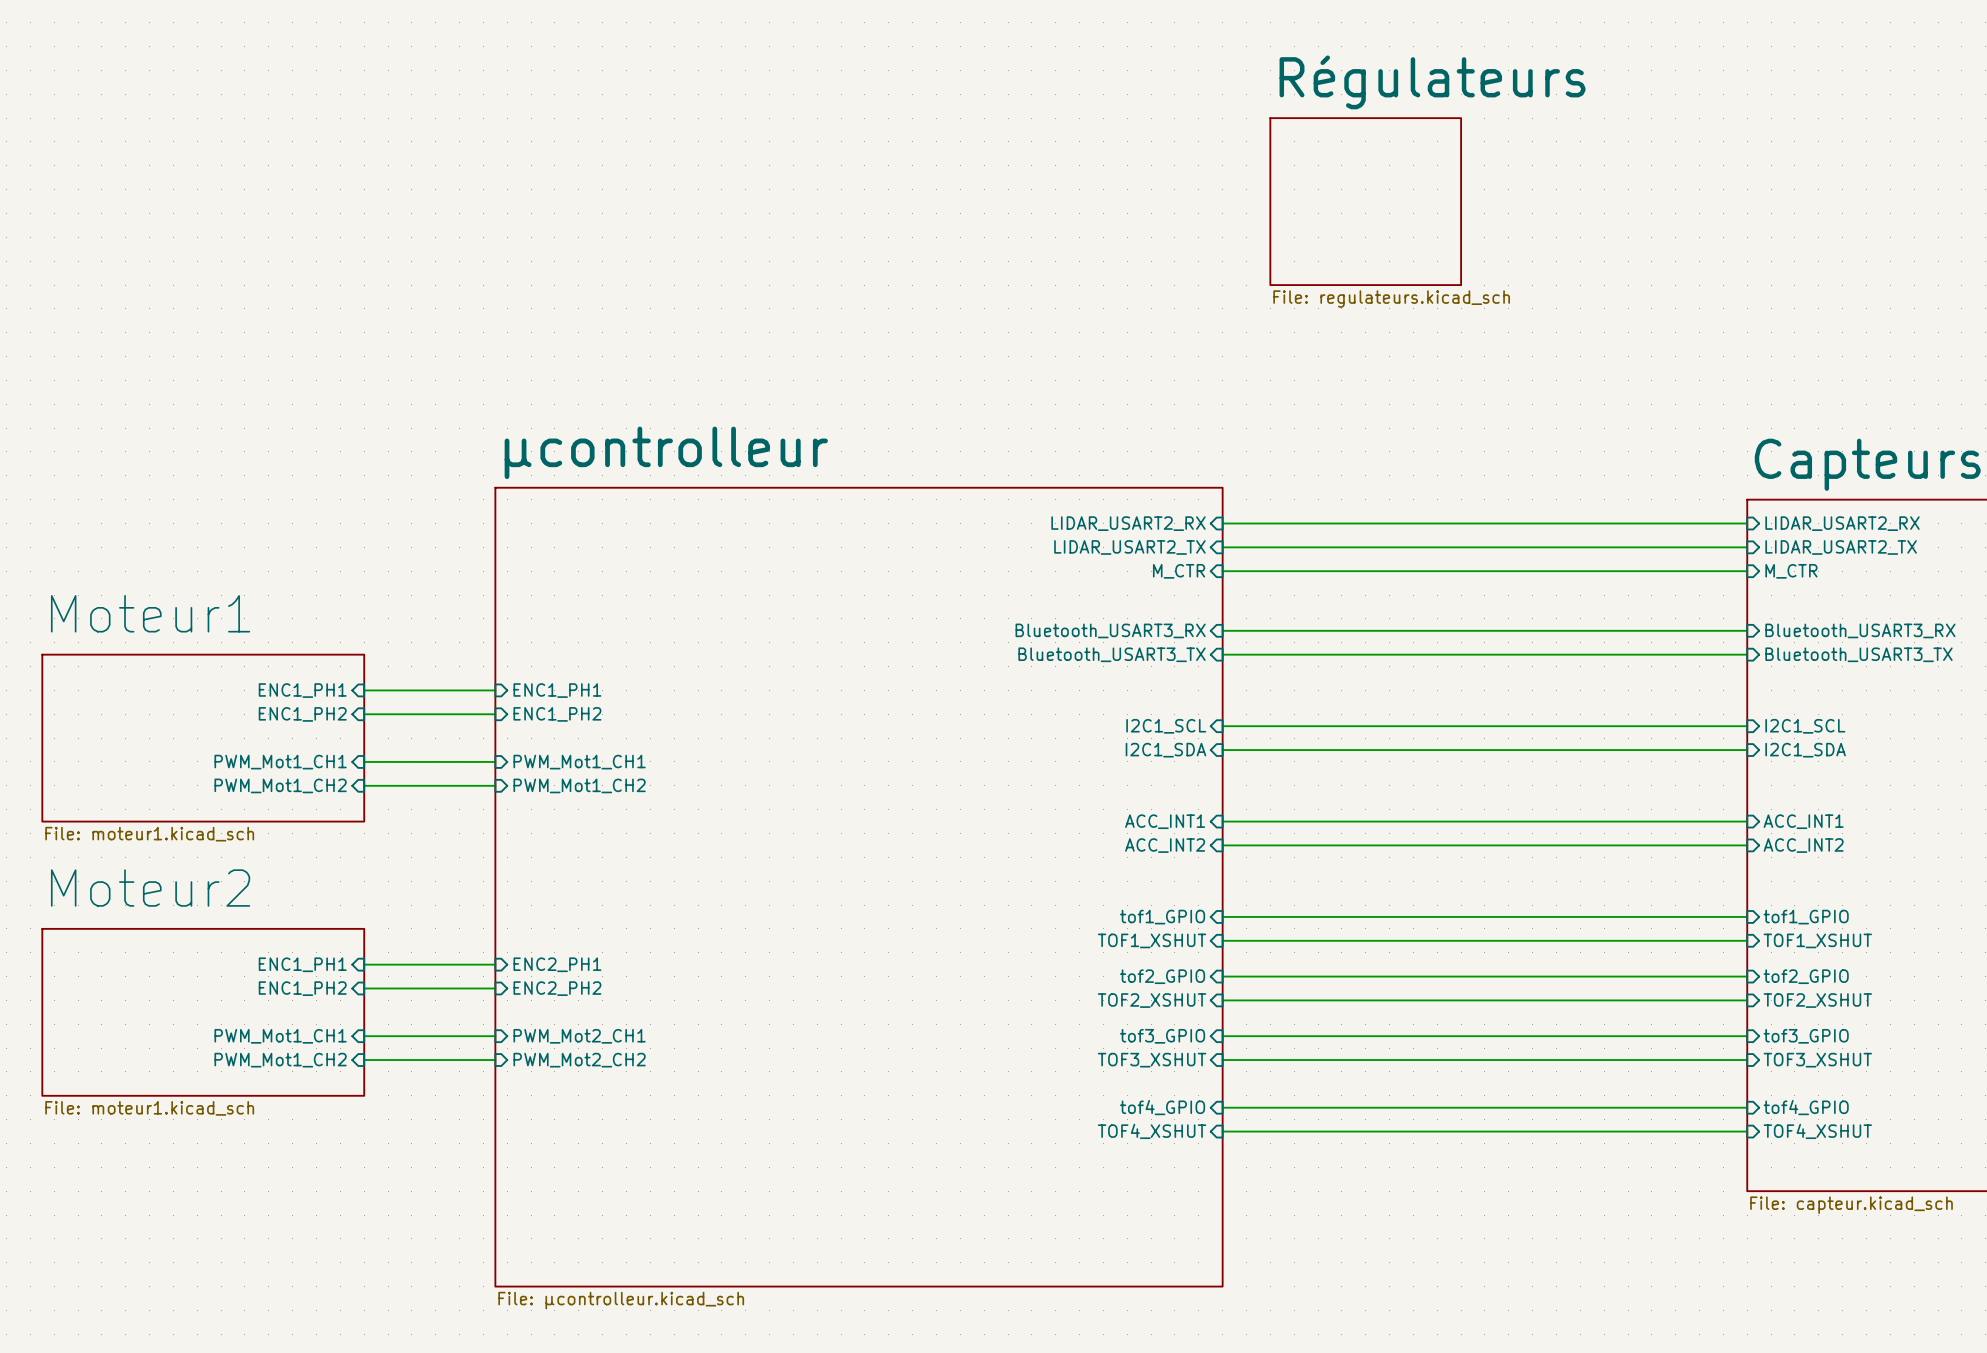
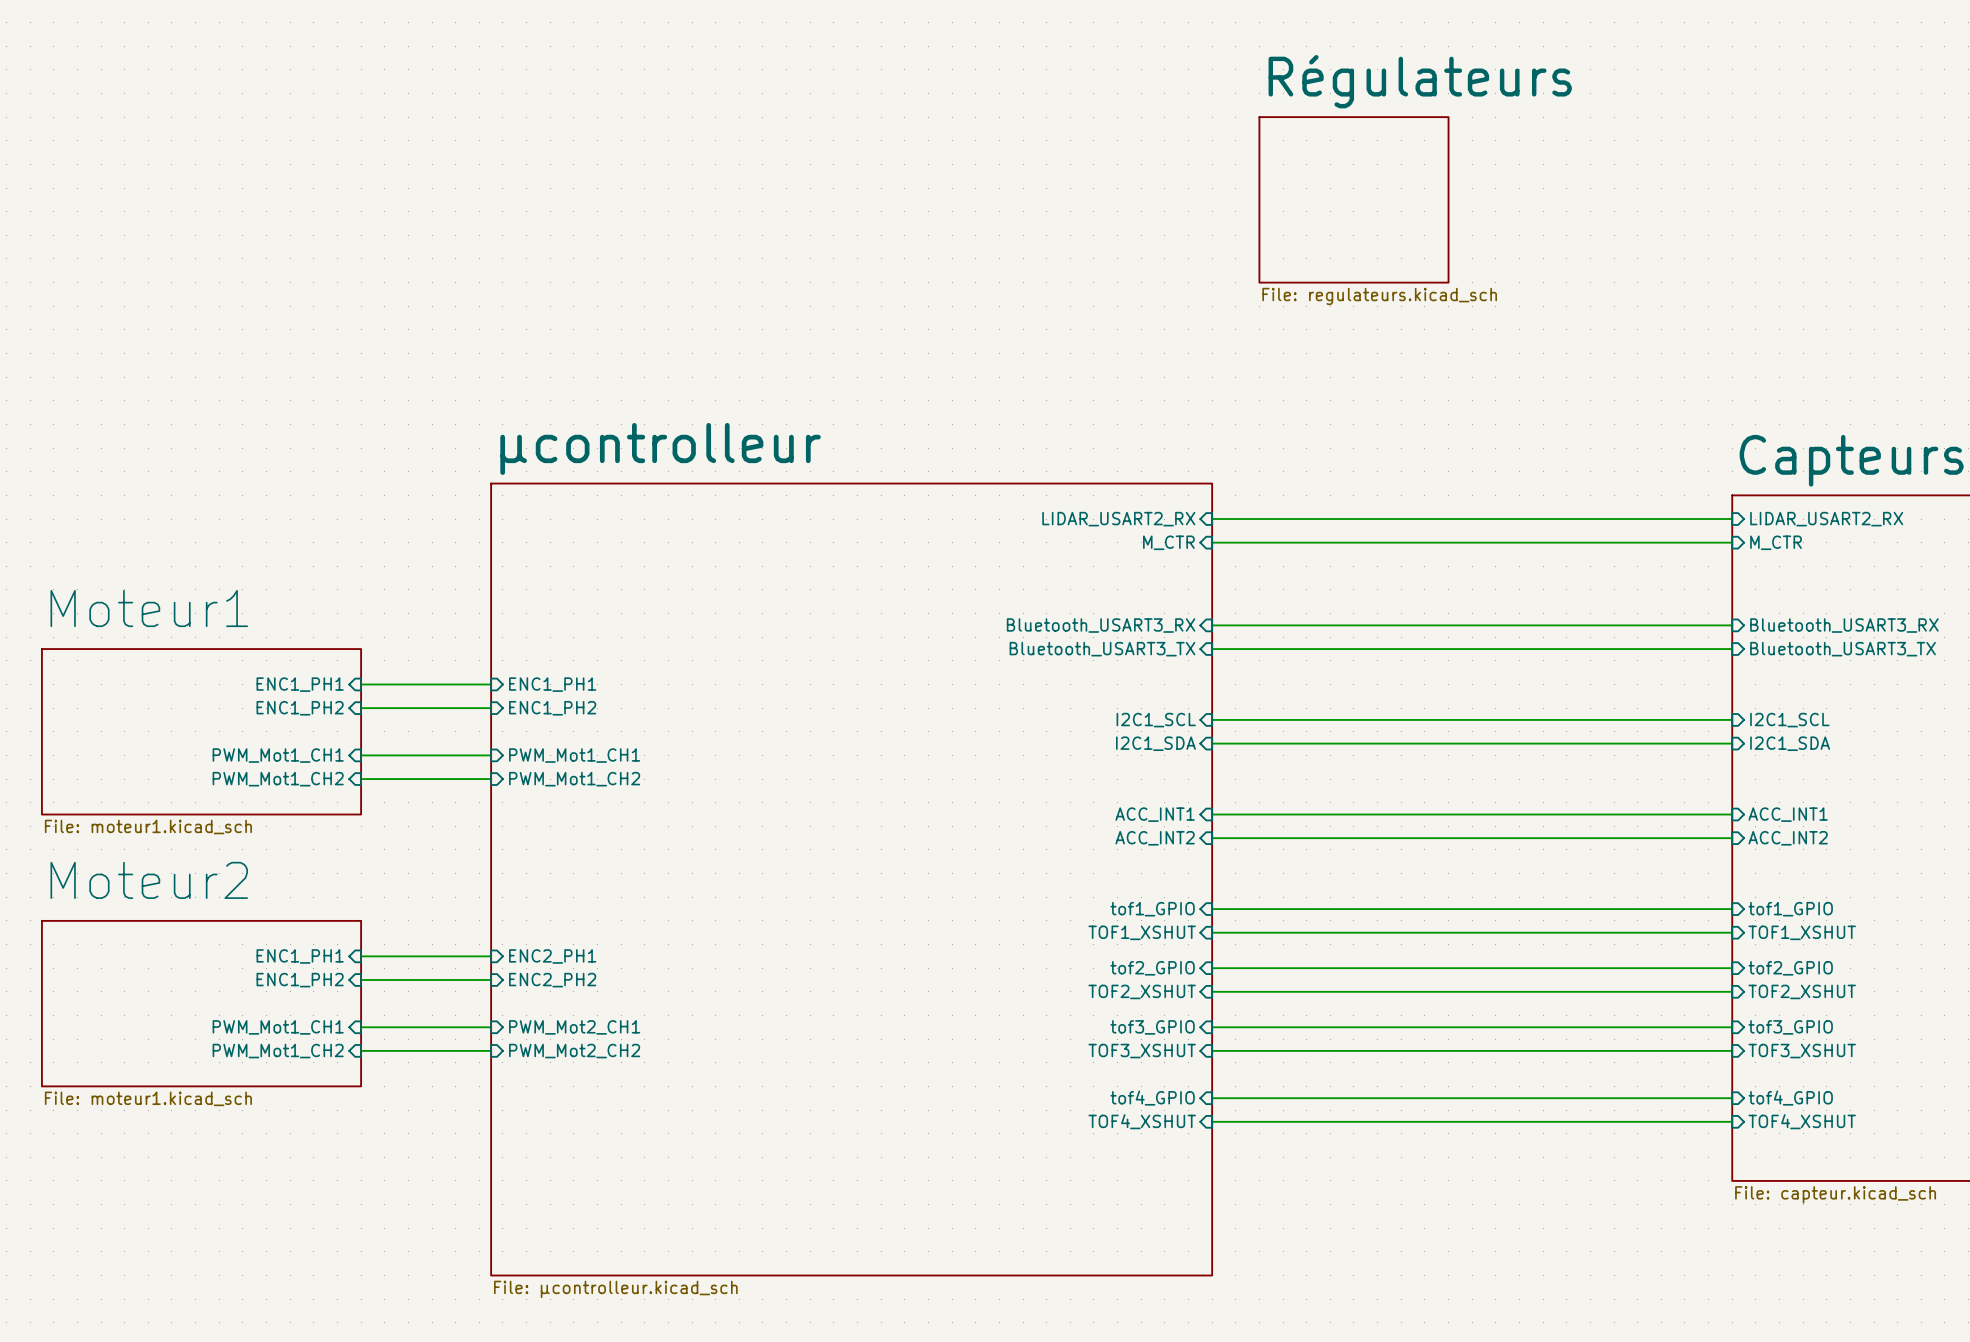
sheet pin: LIDAR_USART2_TX (1129, 547) -> M_CTR (1168, 542)
sheet pin: LIDAR_USART2_TX (1841, 547) -> M_CTR (1776, 542)
sheet pin: M_CTR (1179, 571) -> none
wire: (1222, 571) (1747, 571) -> none
sheet pin: M_CTR (1791, 571) -> none

